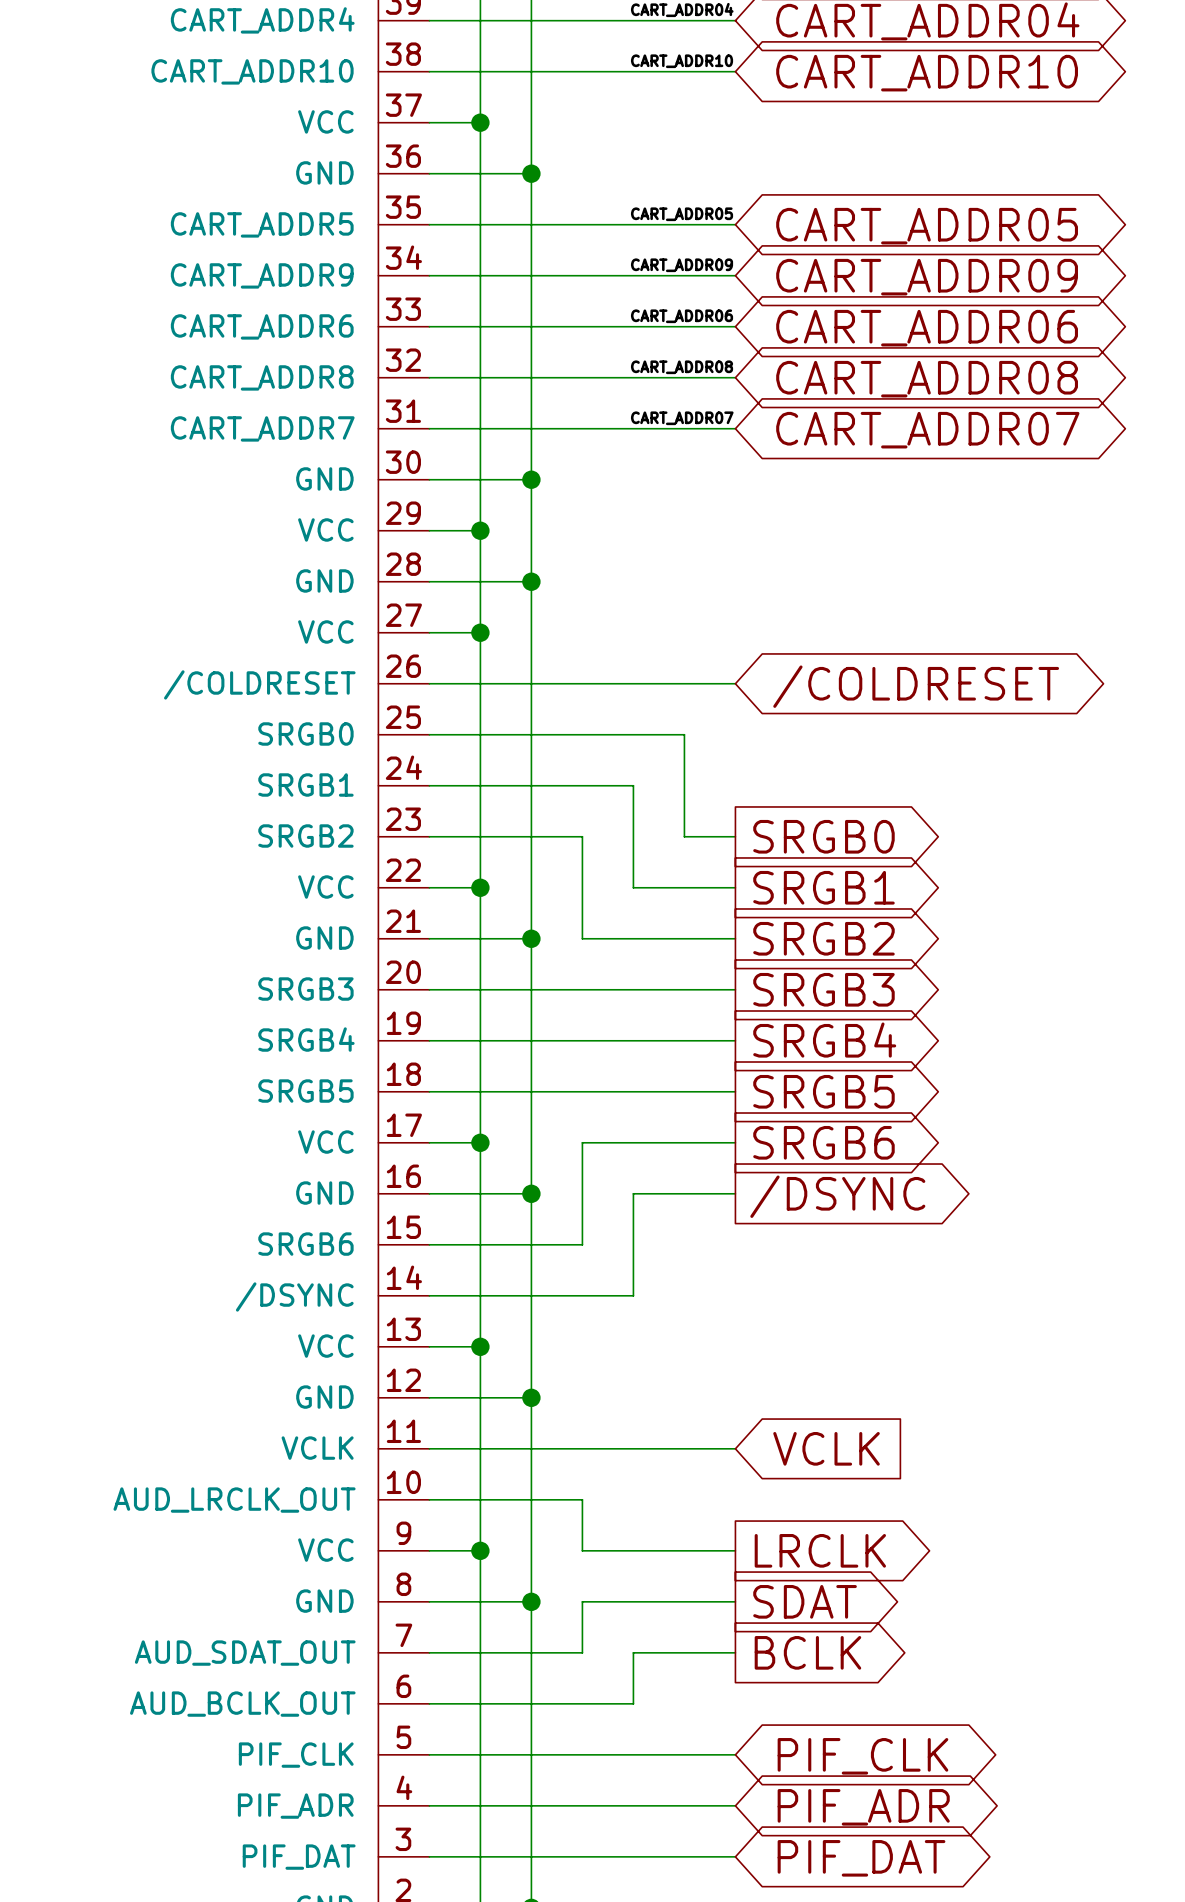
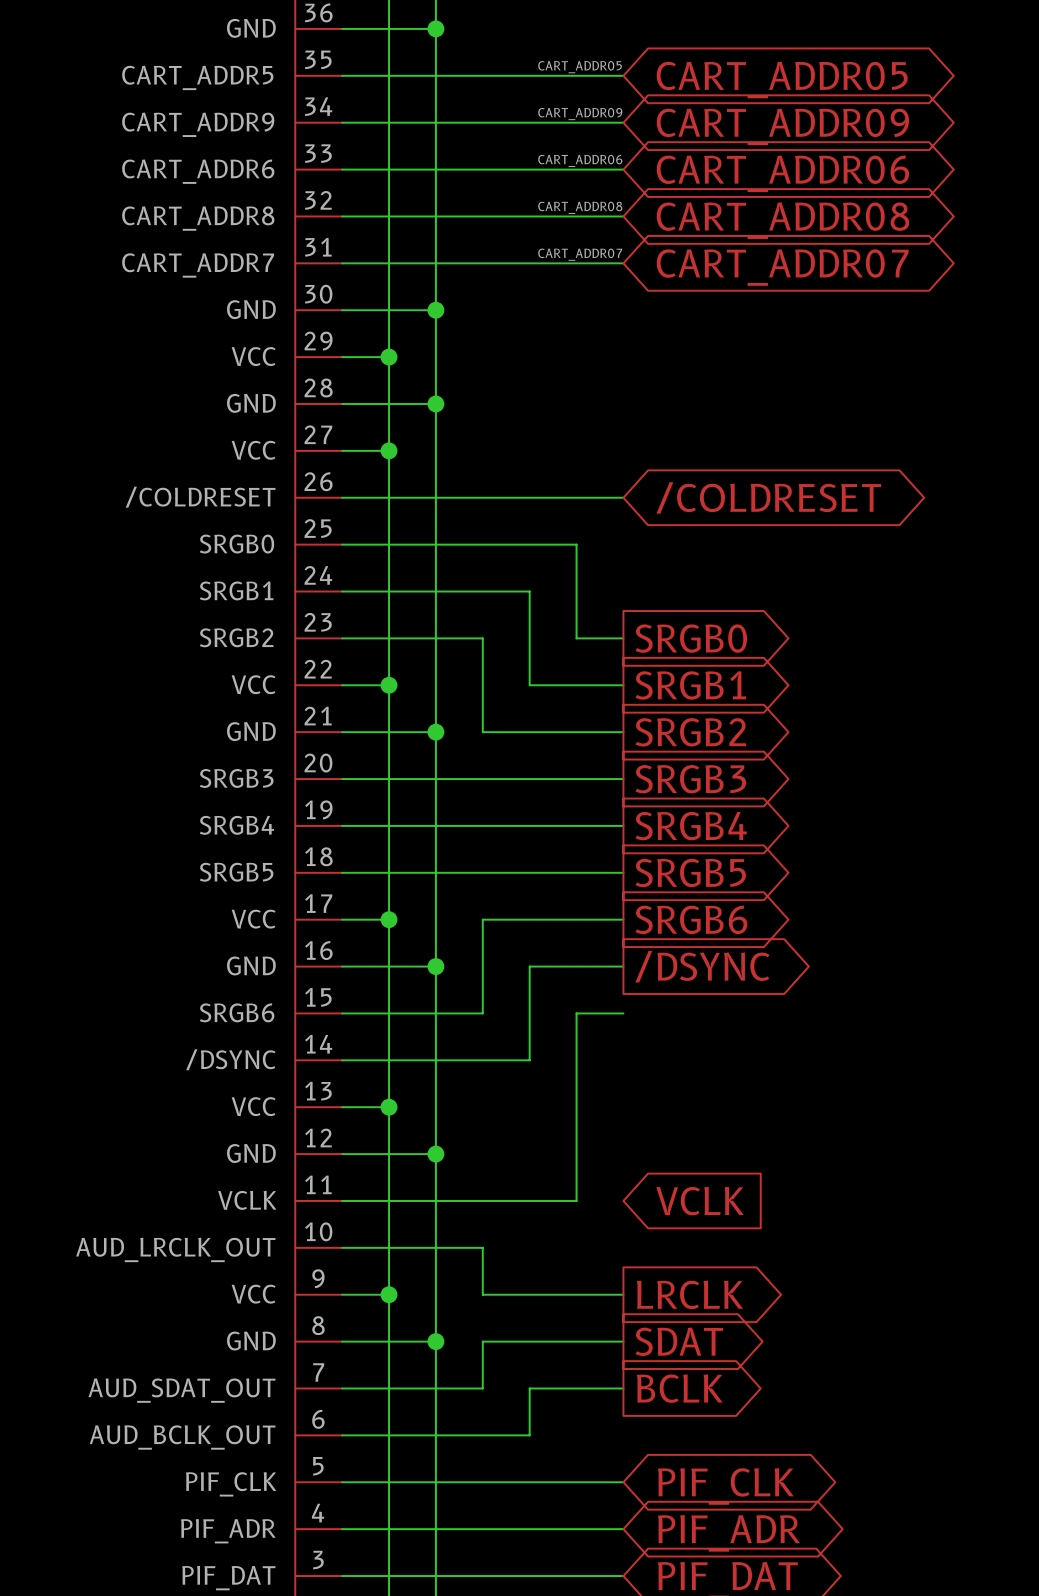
wire: (684, 1448) (735, 1448) -> (576, 1200) (576, 1013) (623, 1013)

